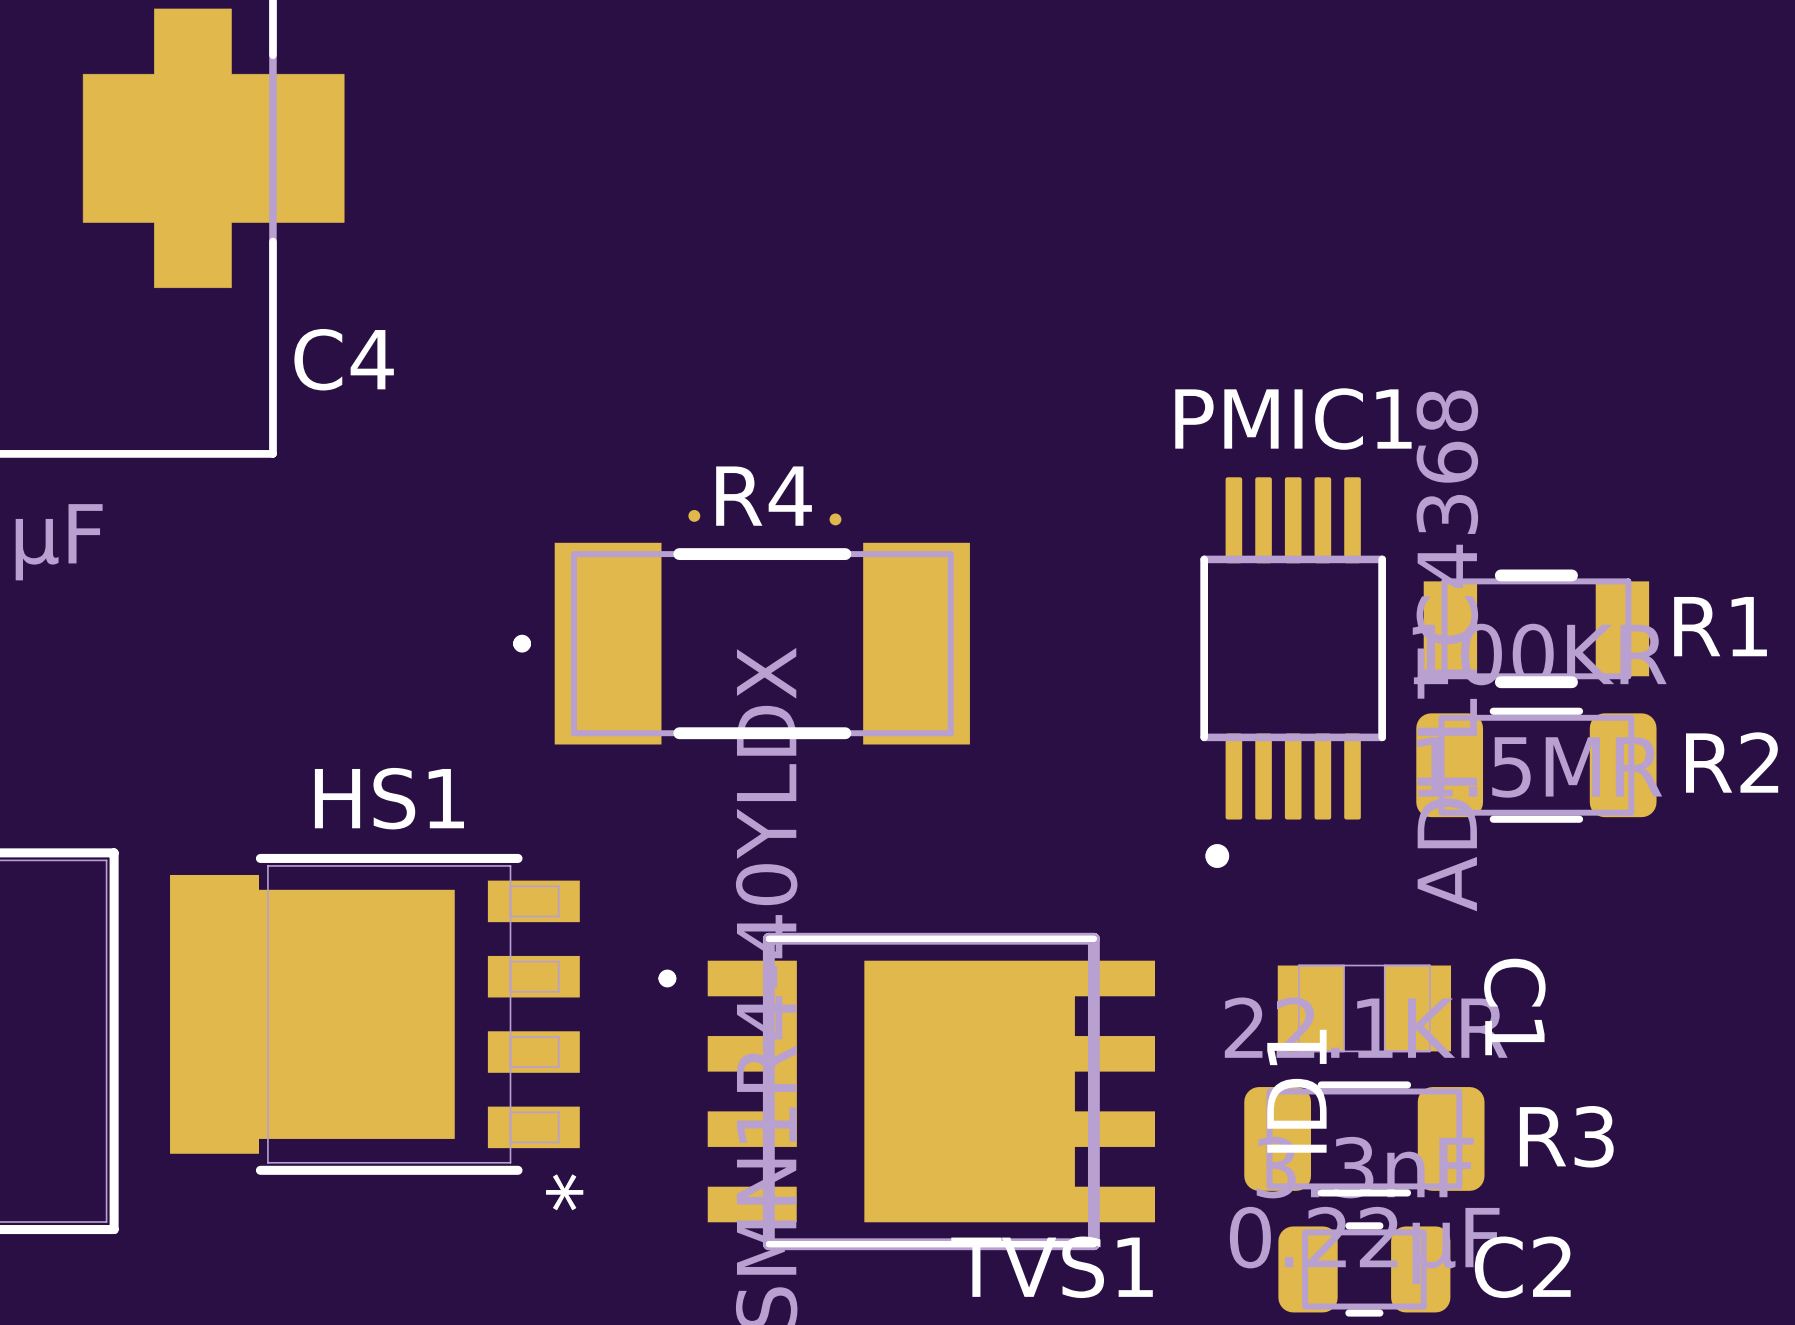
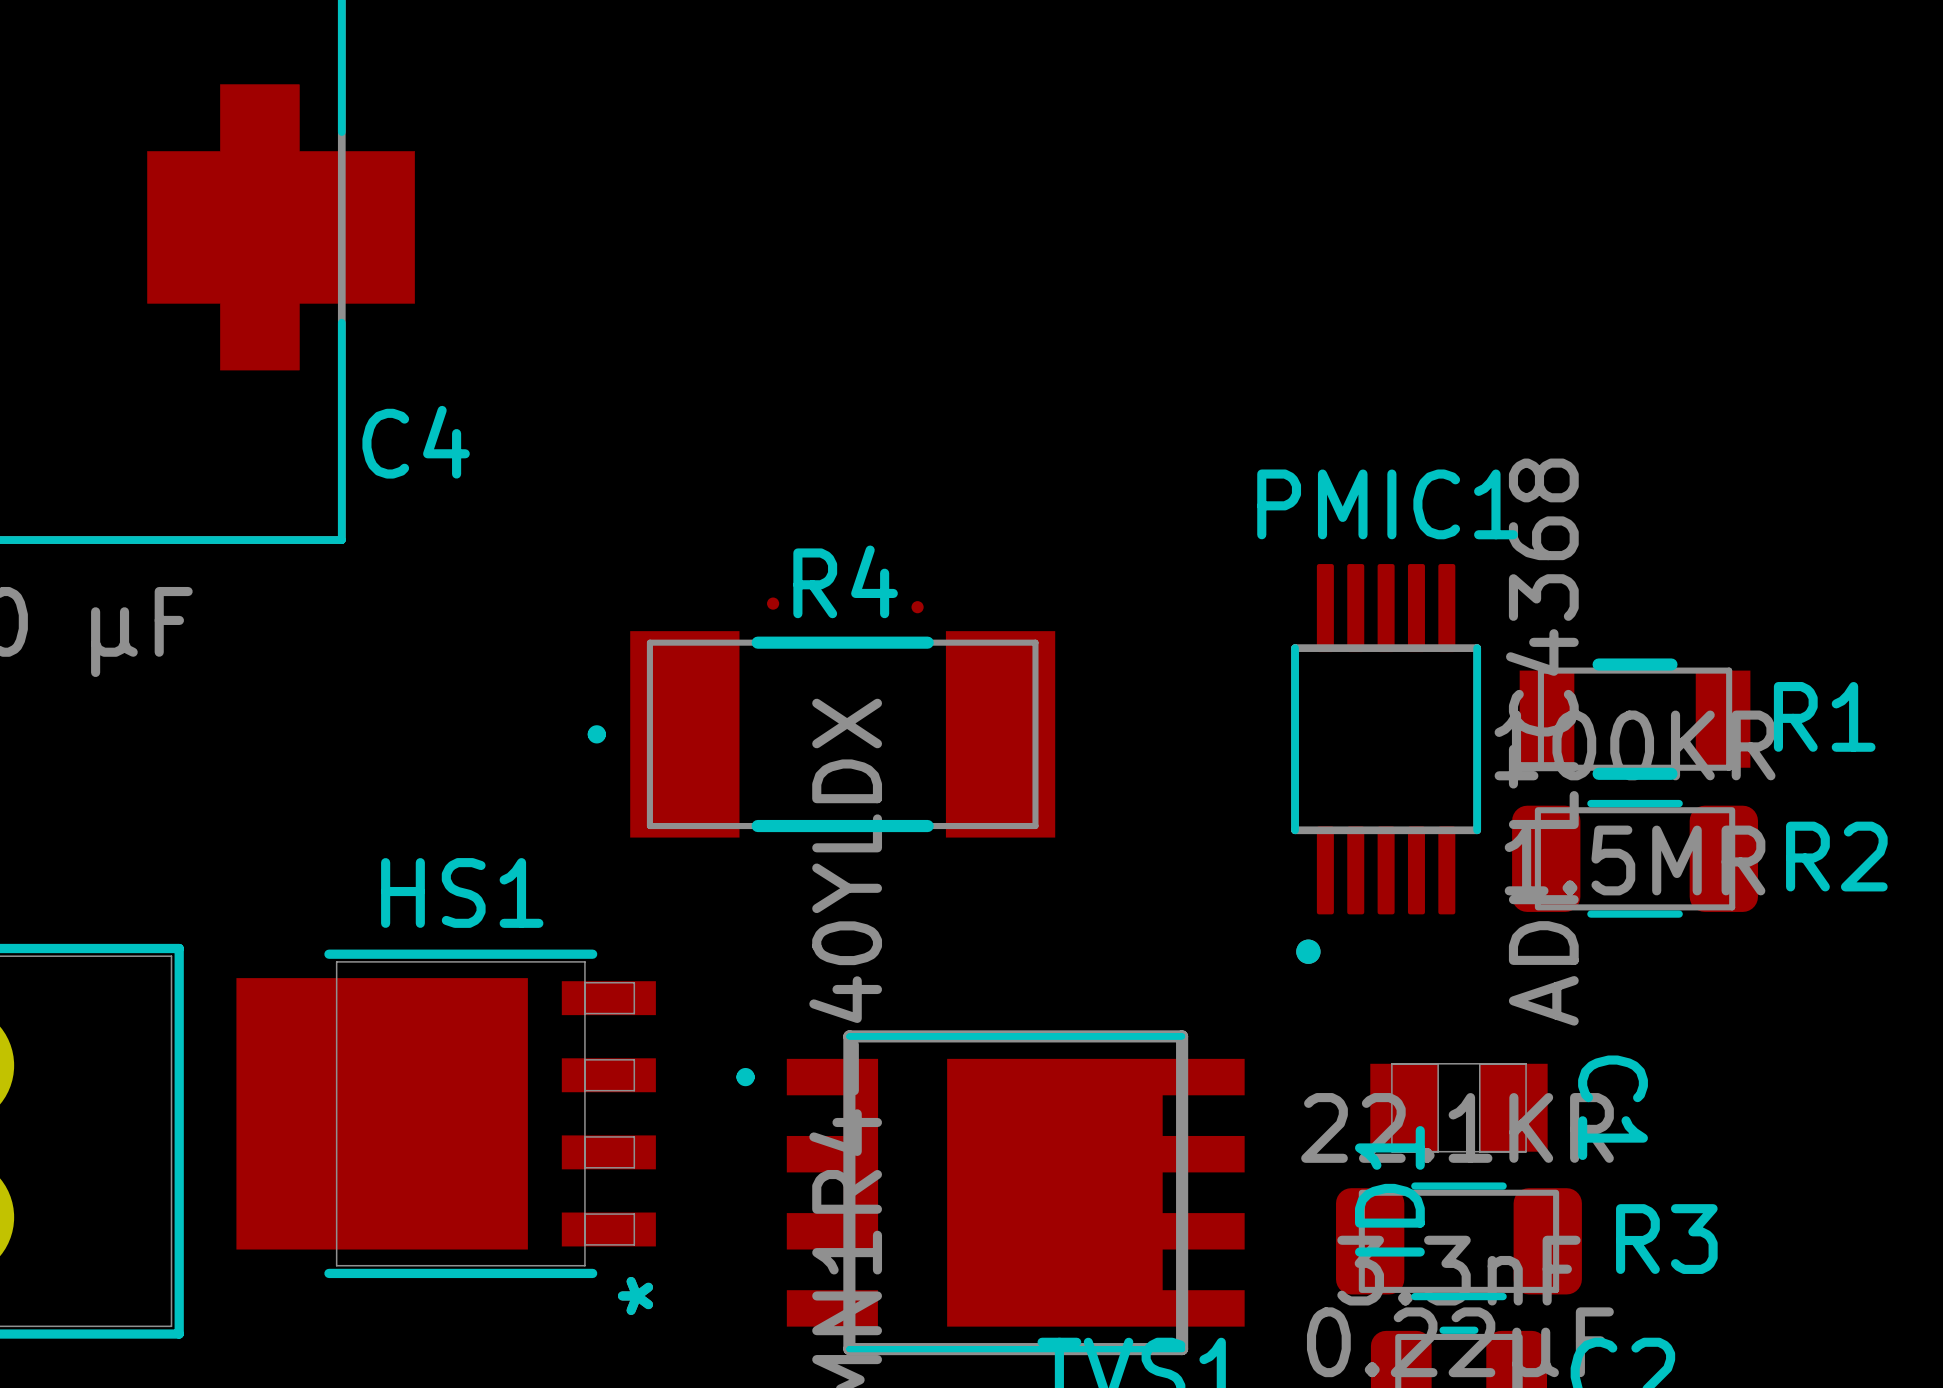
HS1 footprint: [170, 853, 580, 1175] -> [236, 949, 656, 1279]

